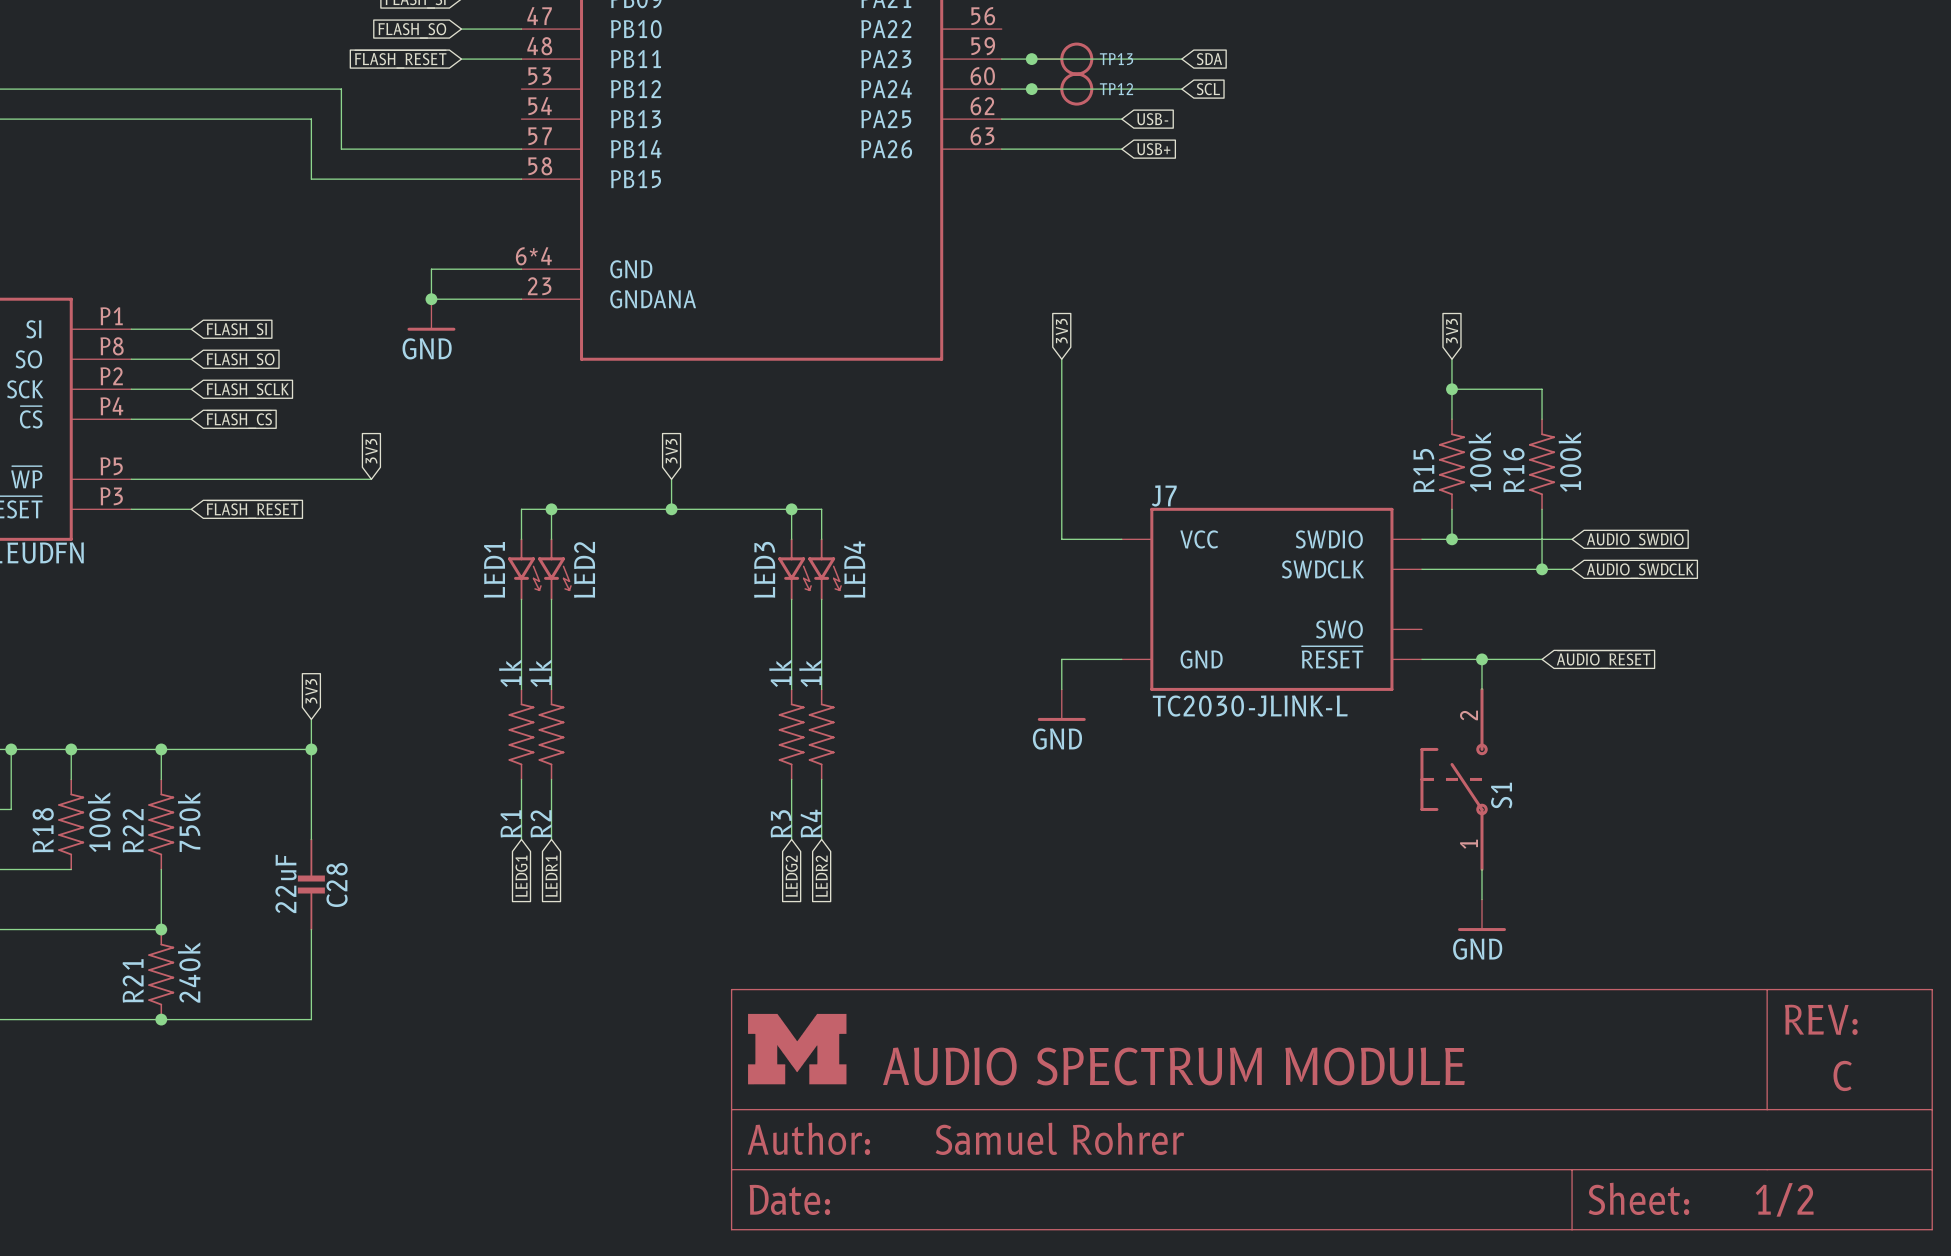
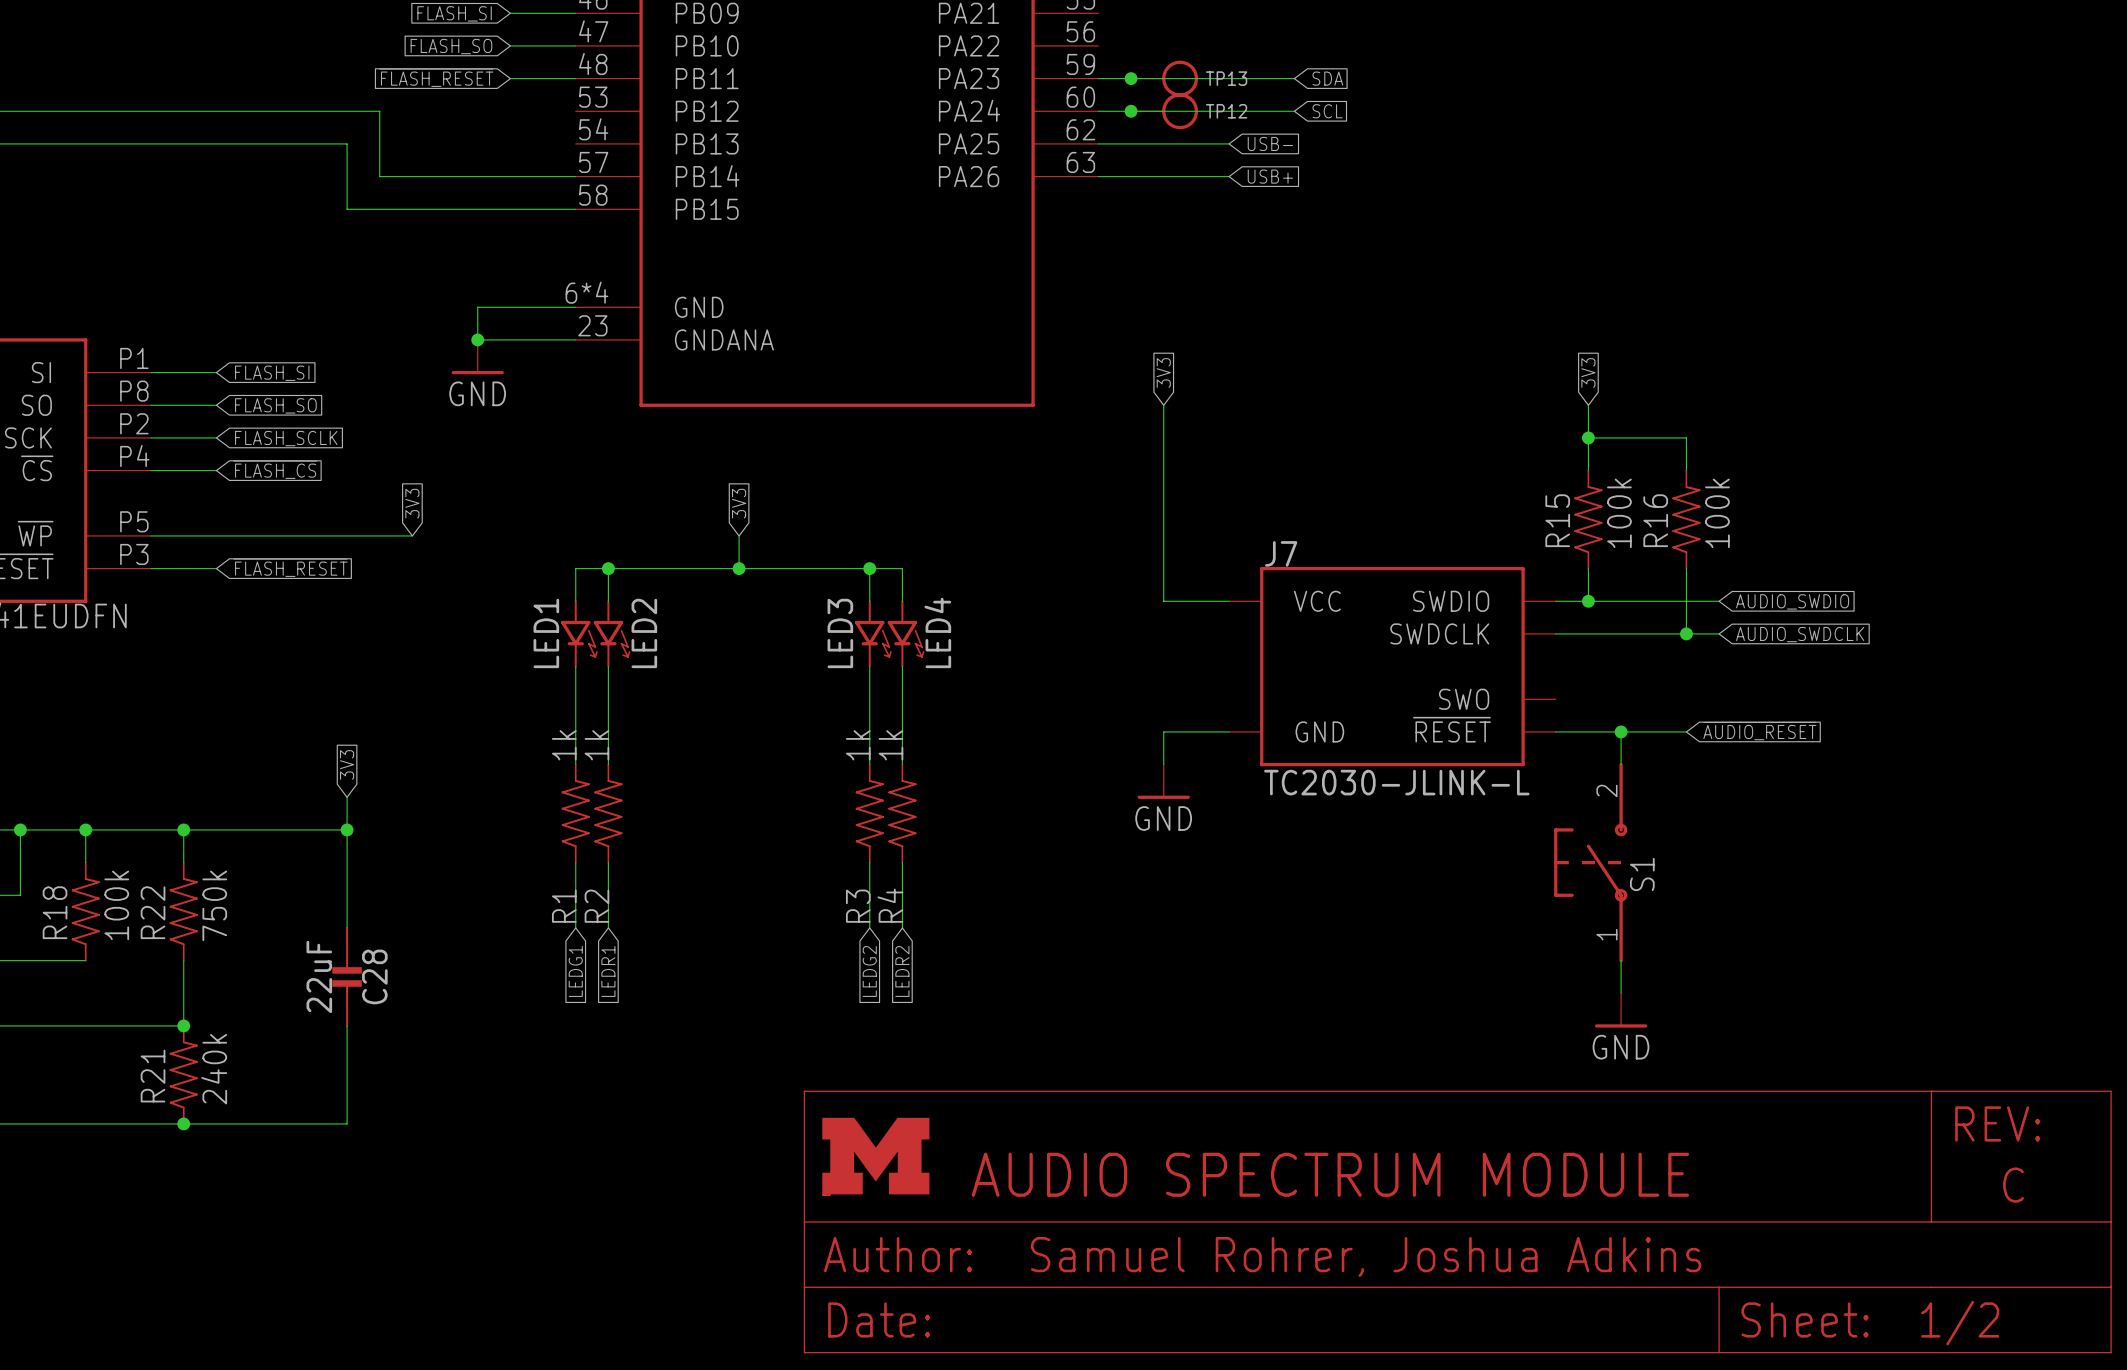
part text: Samuel Rohrer (1059, 1138) -> Samuel Rohrer, Joshua Adkins (1366, 1256)

